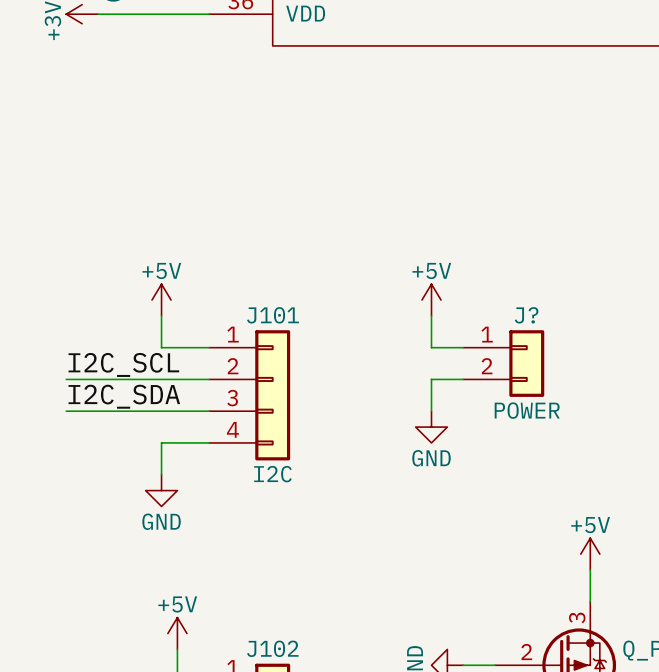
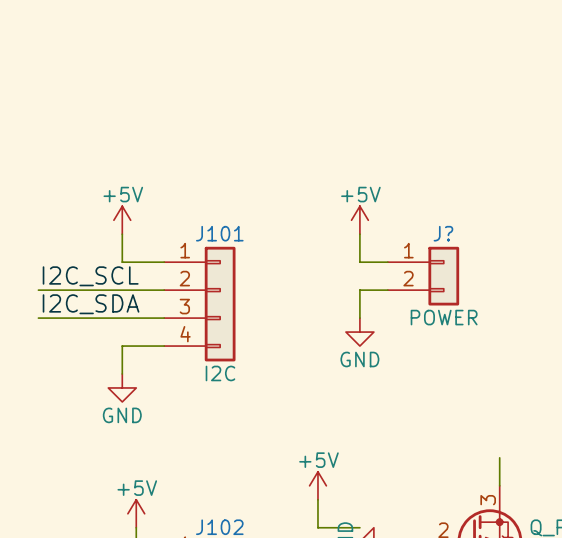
power symbol position: +5V (590, 554) -> +5V (317, 485)
wire: none -> (317, 499) (317, 527) (359, 527)

